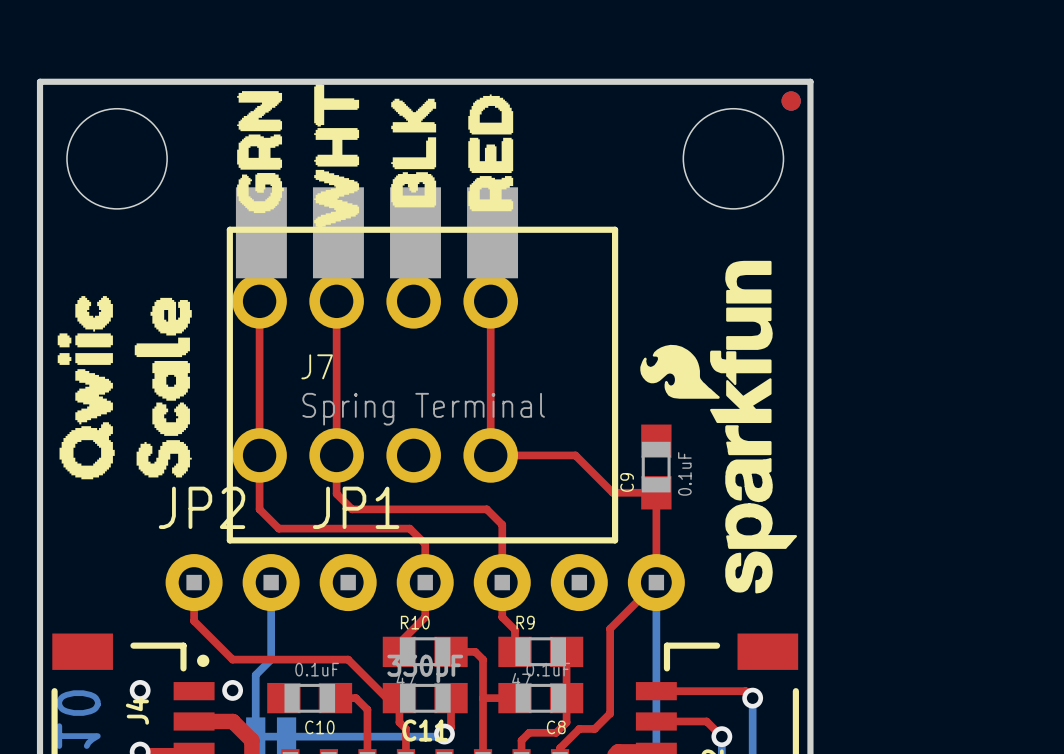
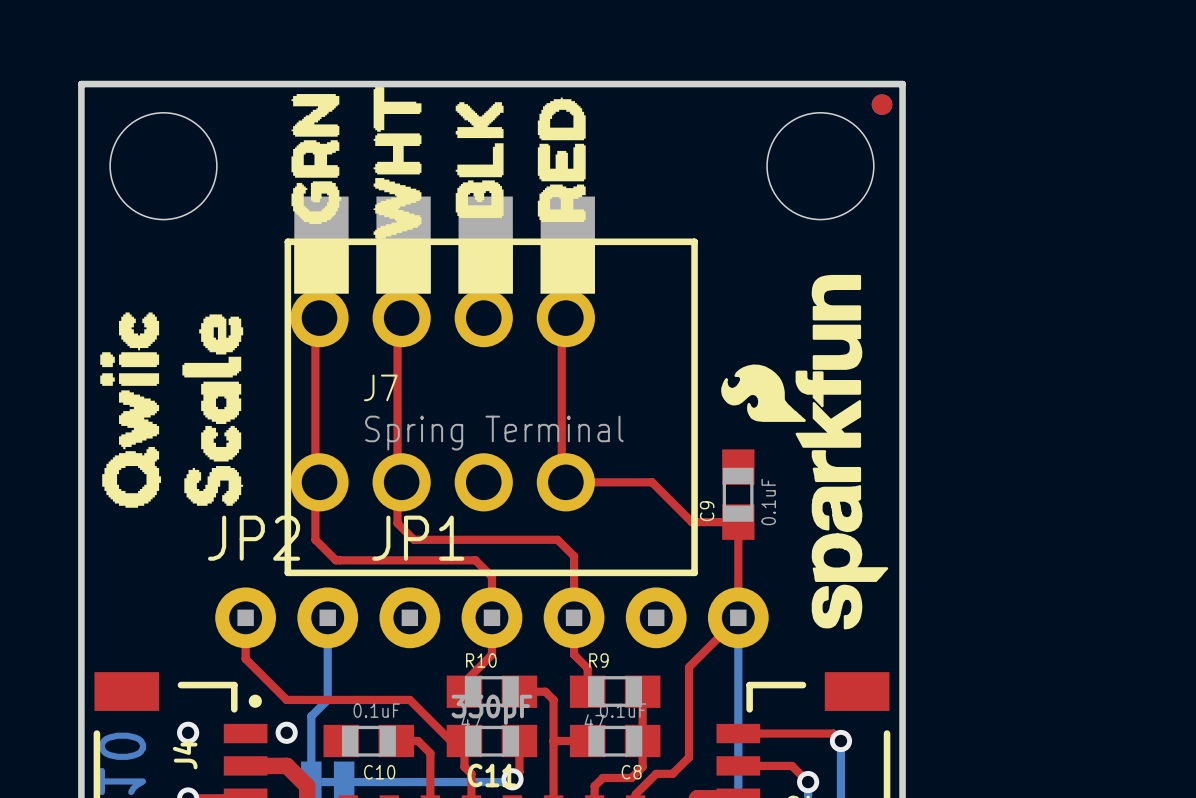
J7 footprint: [226, 187, 619, 544] -> [284, 196, 698, 577]

